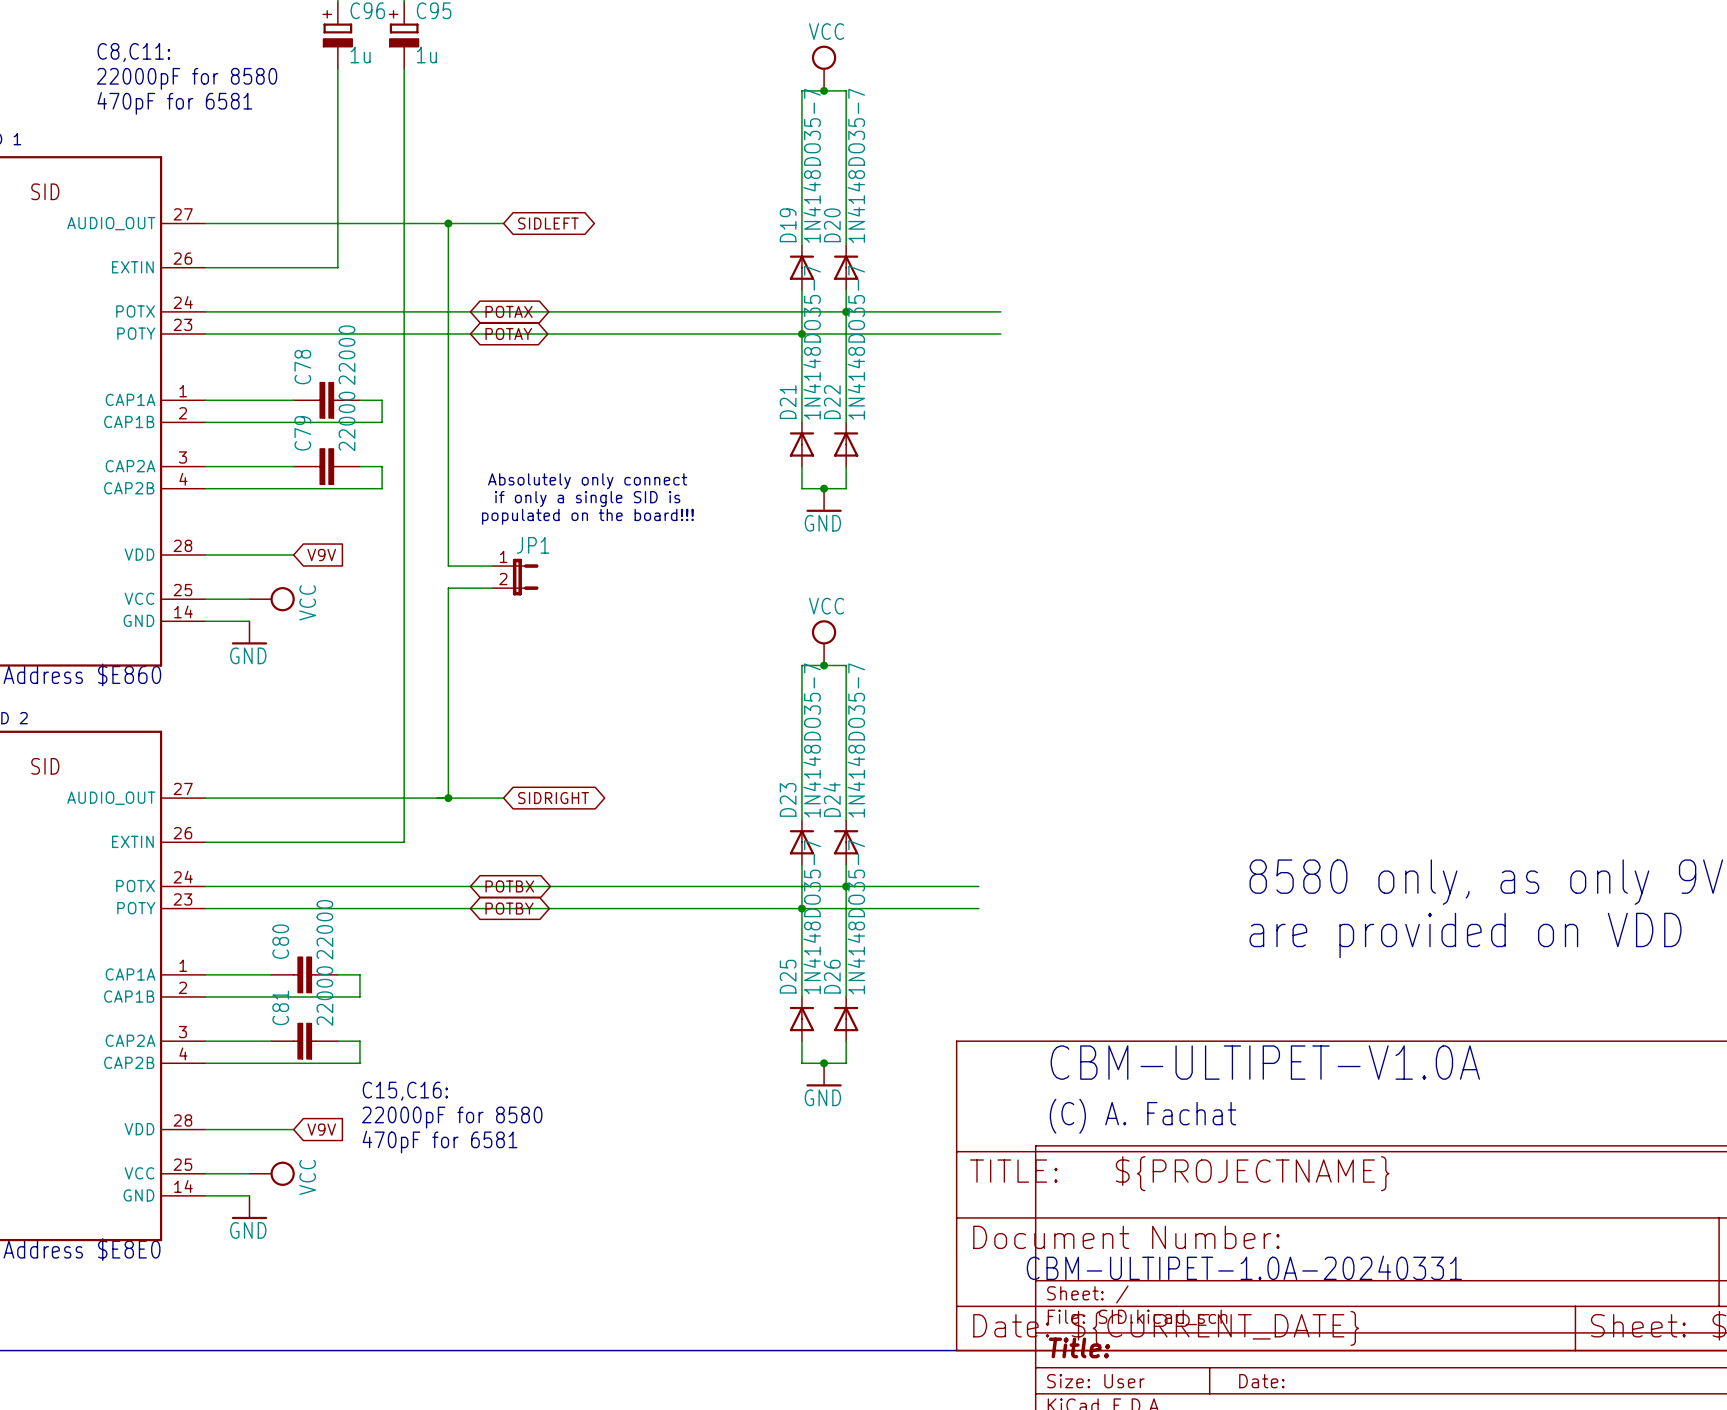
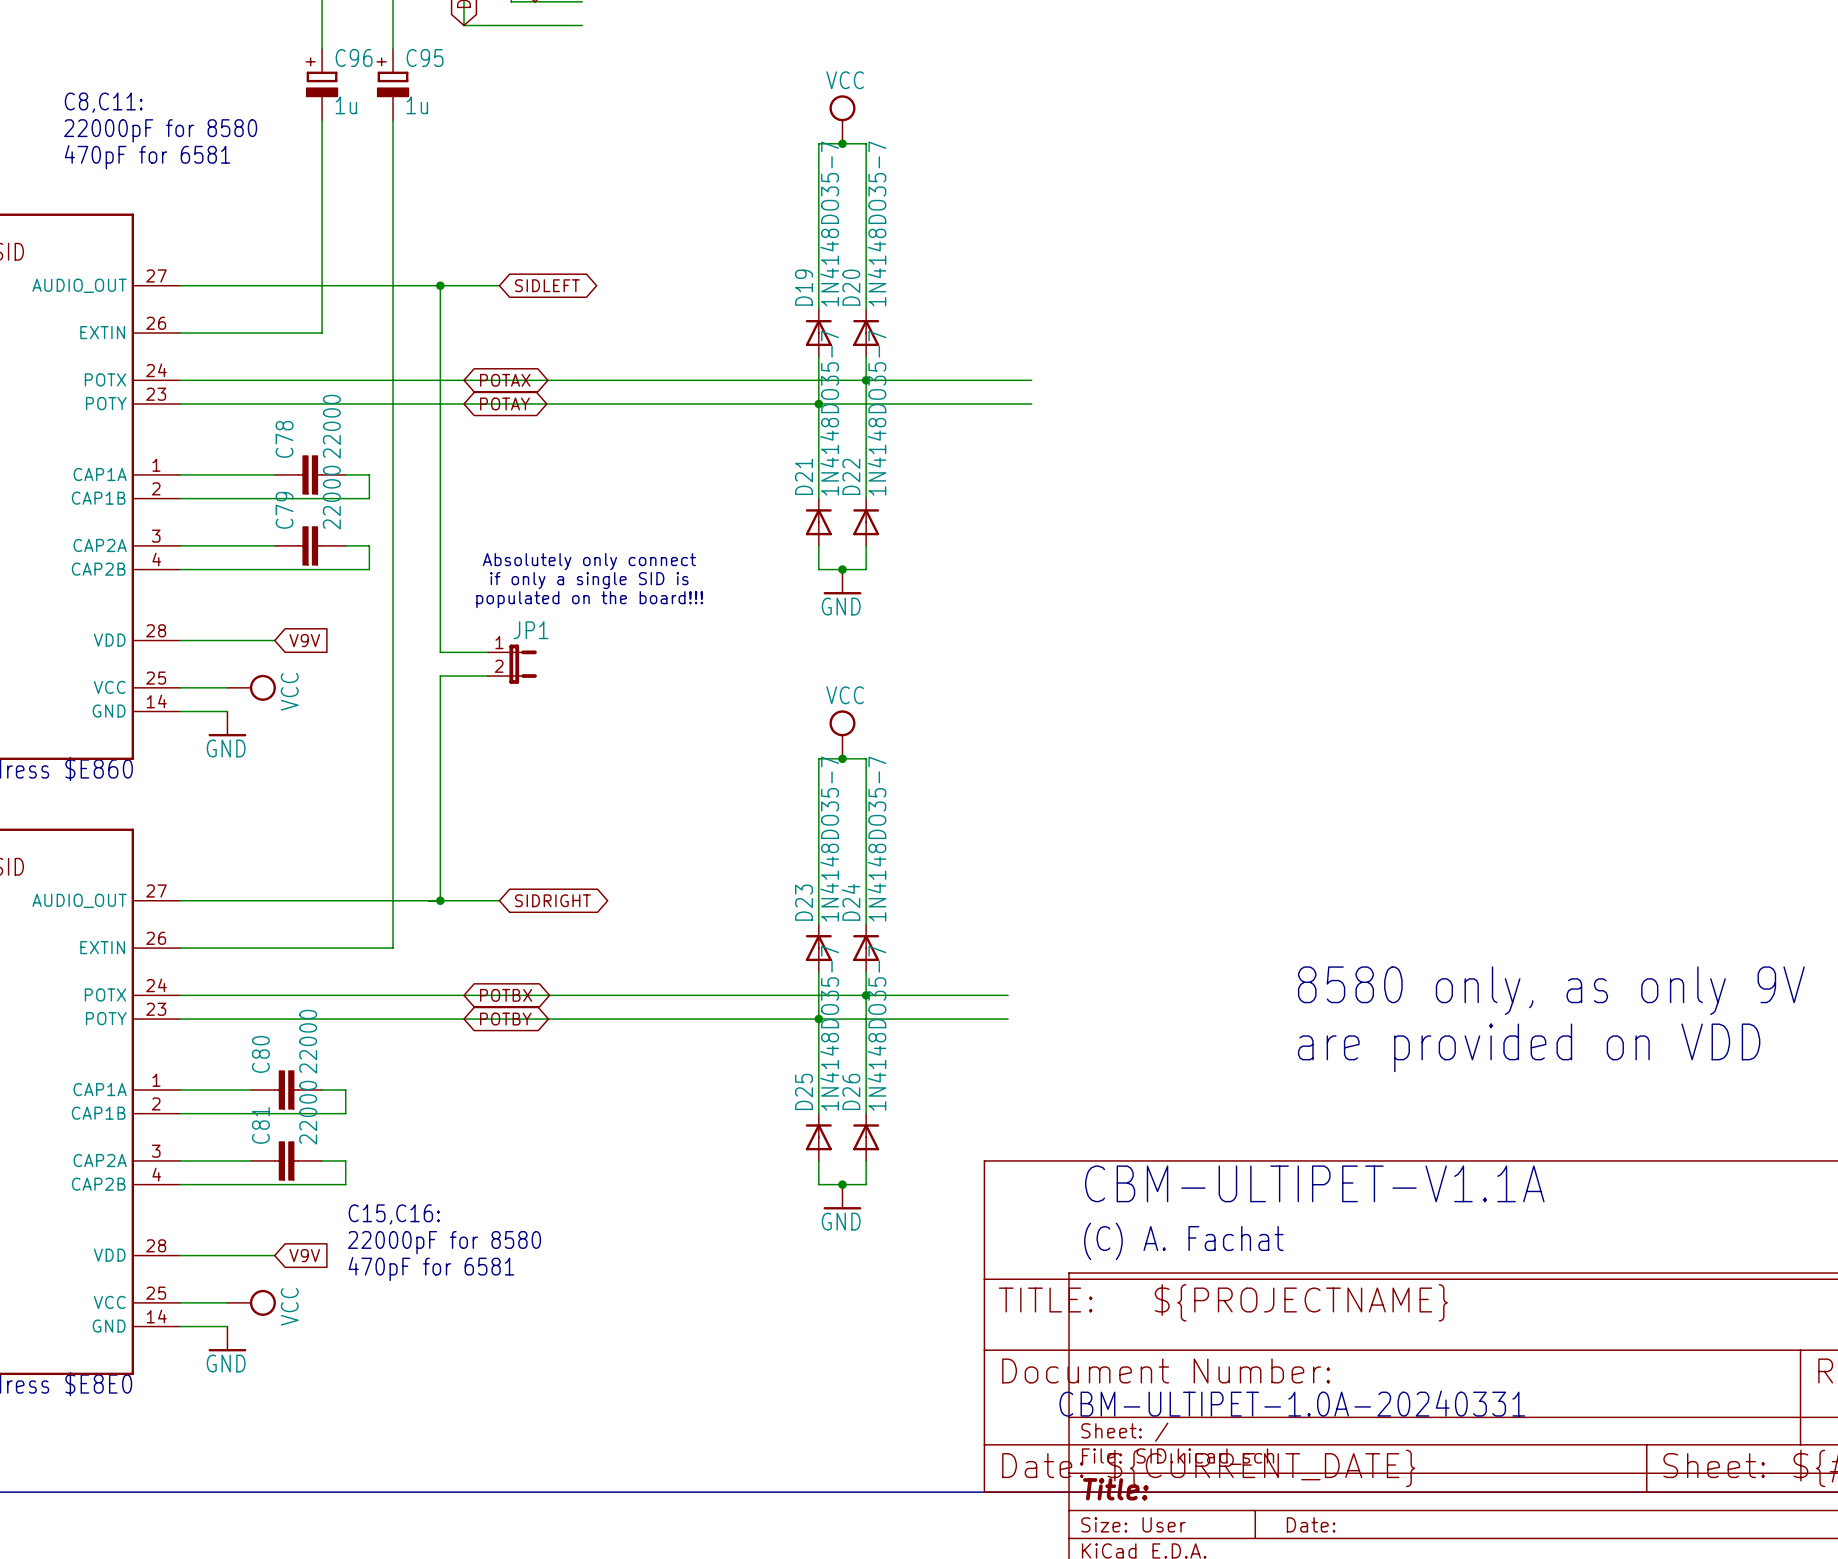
text: CBM-ULTIPET-V1.0A (1265, 1062) -> CBM-ULTIPET-V1.1A (1314, 1183)

